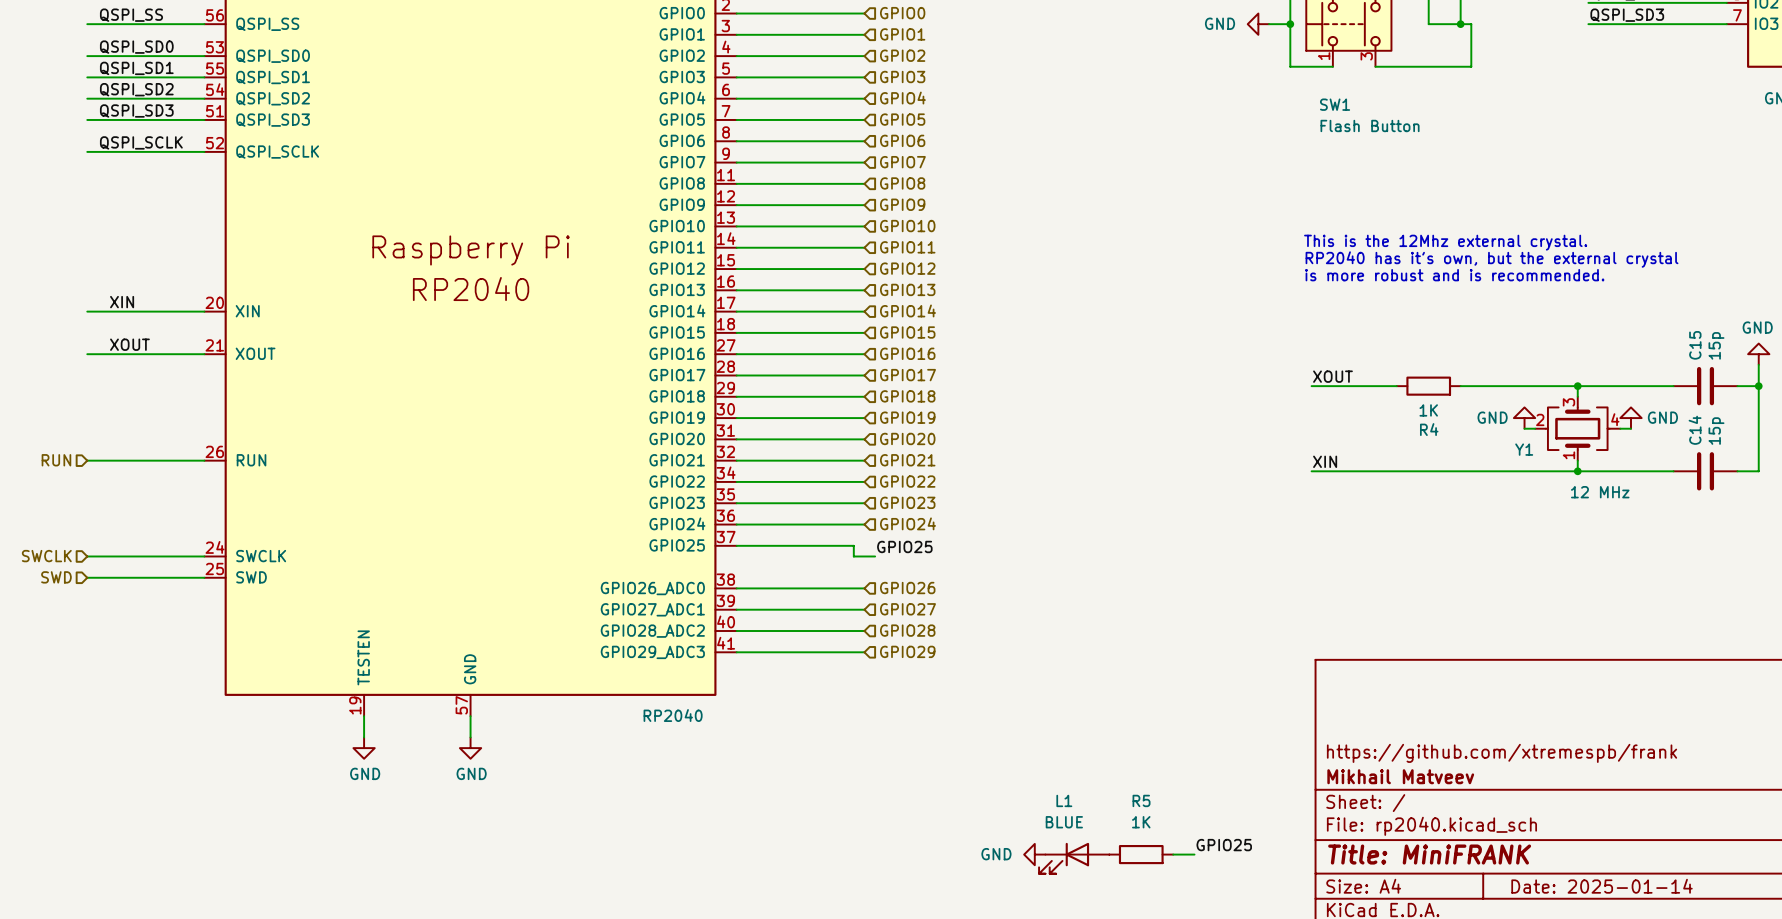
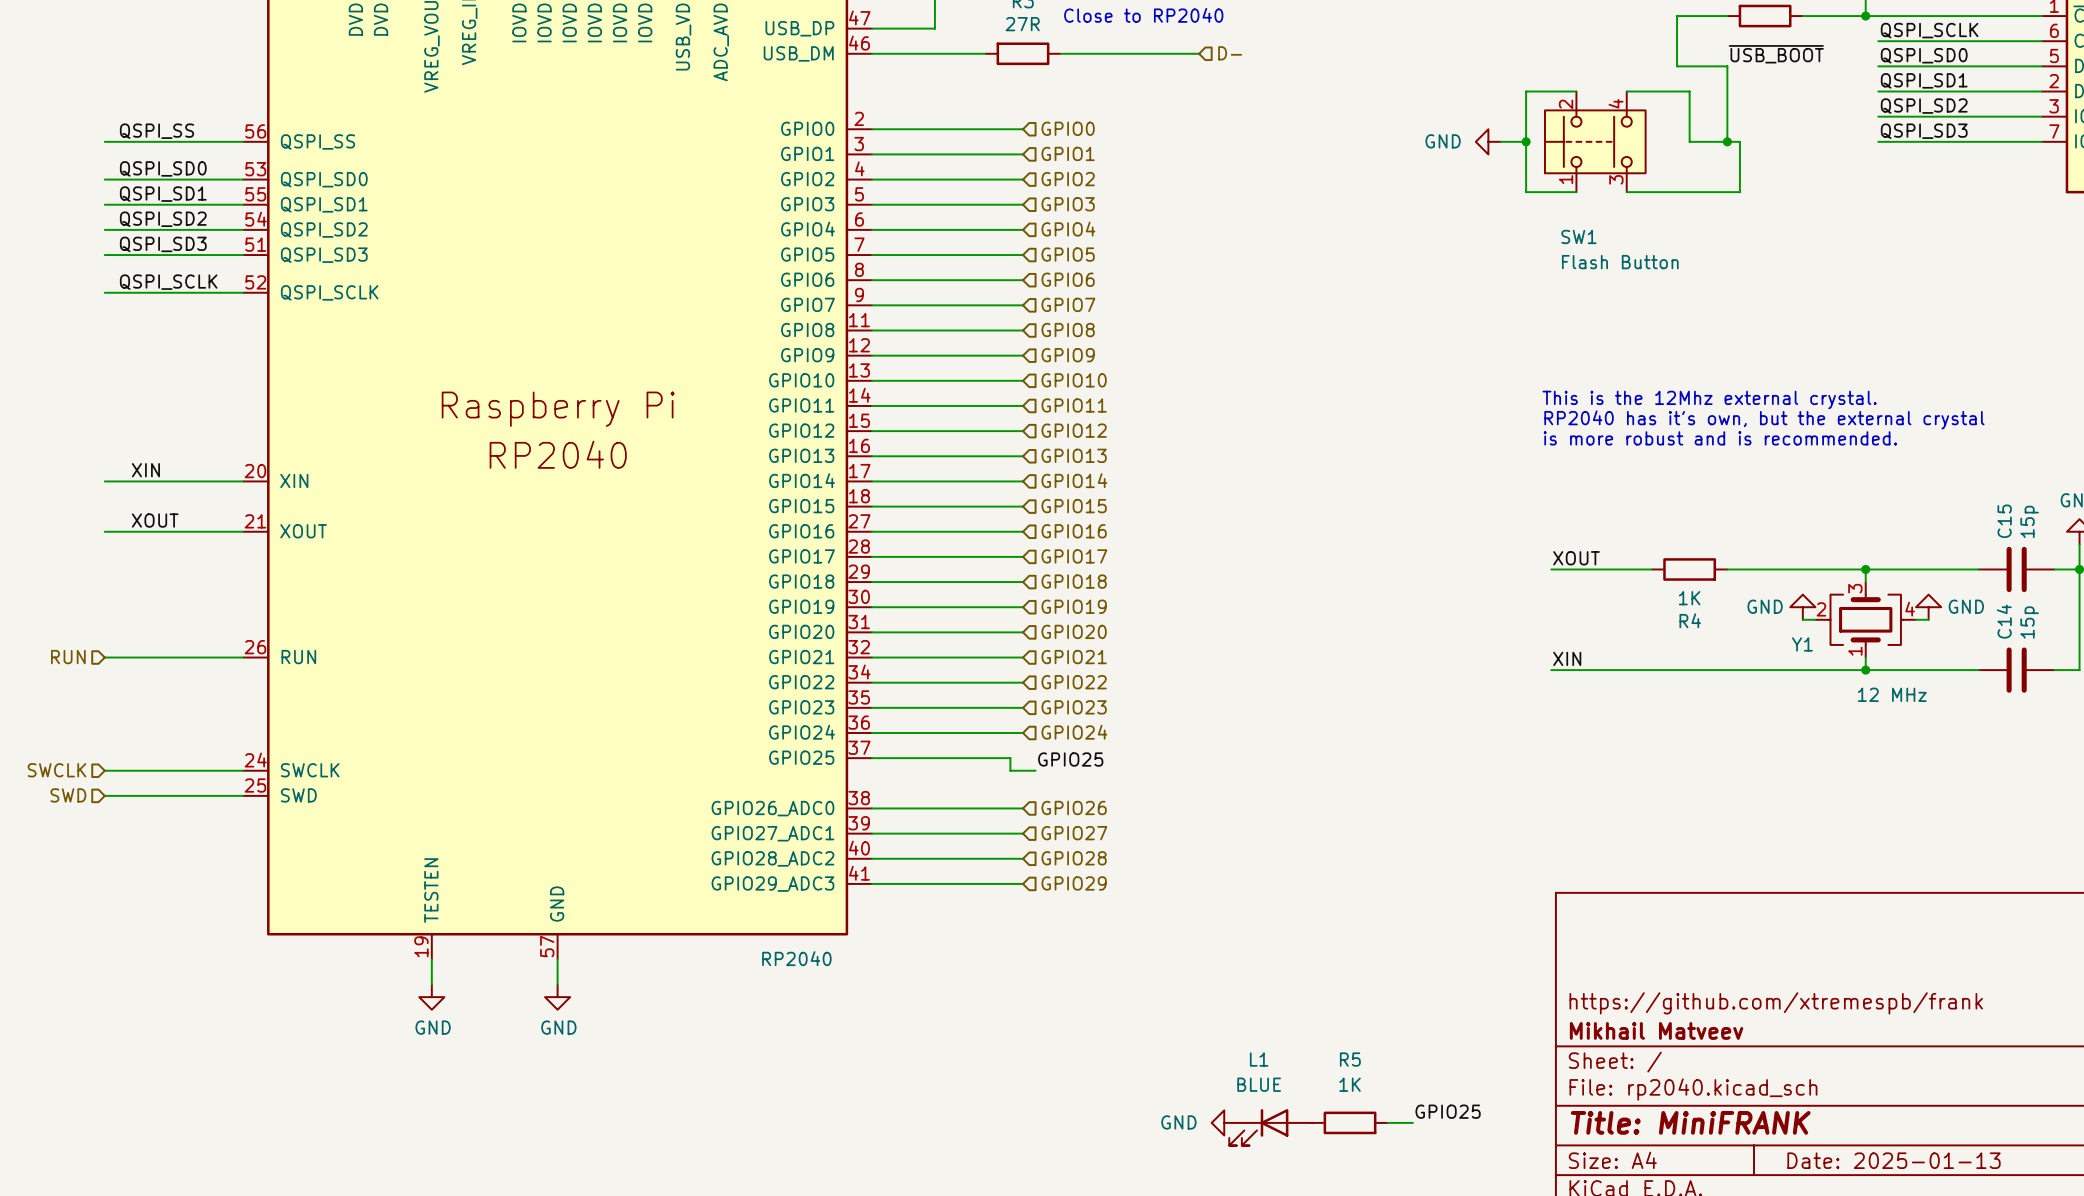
title block: Date: 2025-01-14 (1602, 886) -> Date: 2025-01-13 (1894, 1160)

